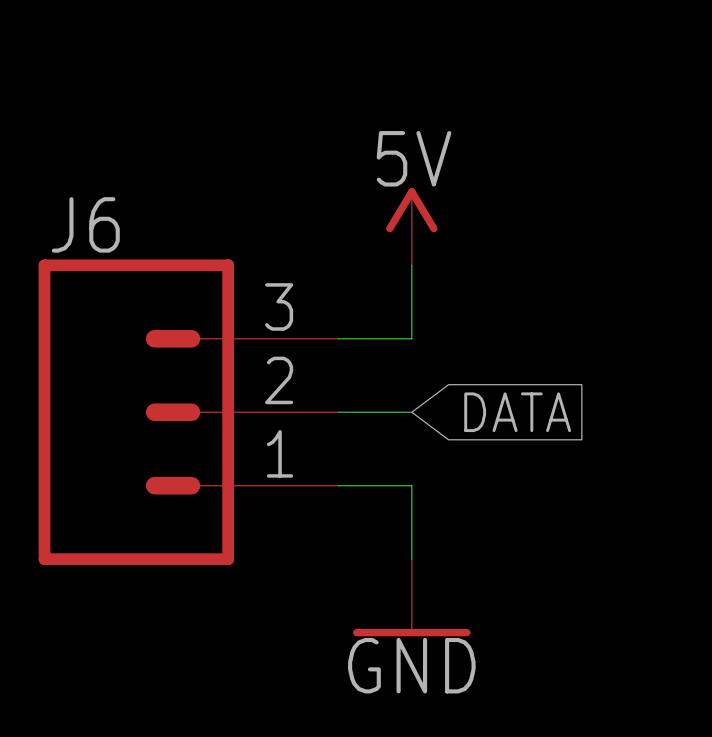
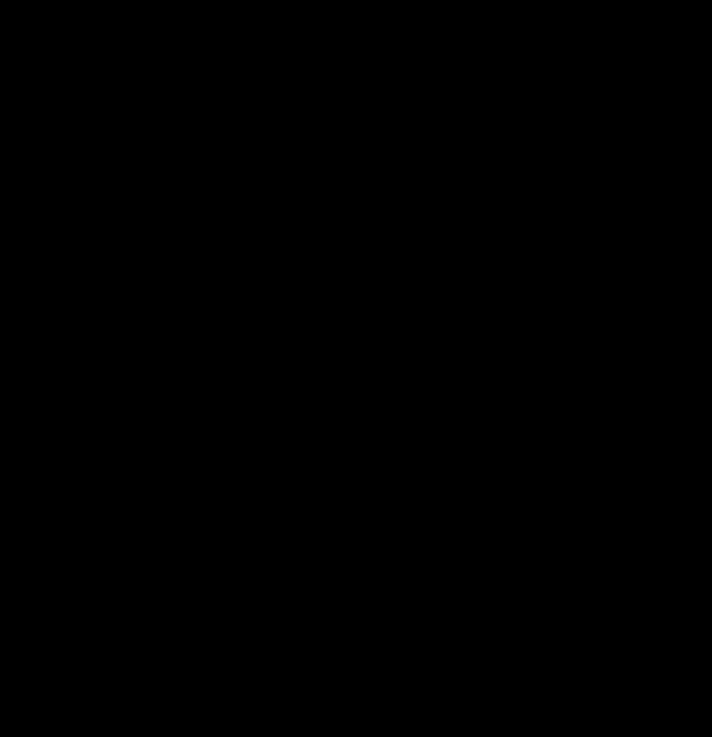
power symbol: 5V (411, 226) -> none
wire: (411, 265) (411, 338) (338, 338) -> none
J6: (188, 412) -> none
wire: (338, 412) (411, 412) -> none
global label: DATA (517, 412) -> none
wire: (338, 485) (411, 485) (411, 559) -> none
power symbol: GND (411, 597) -> none

